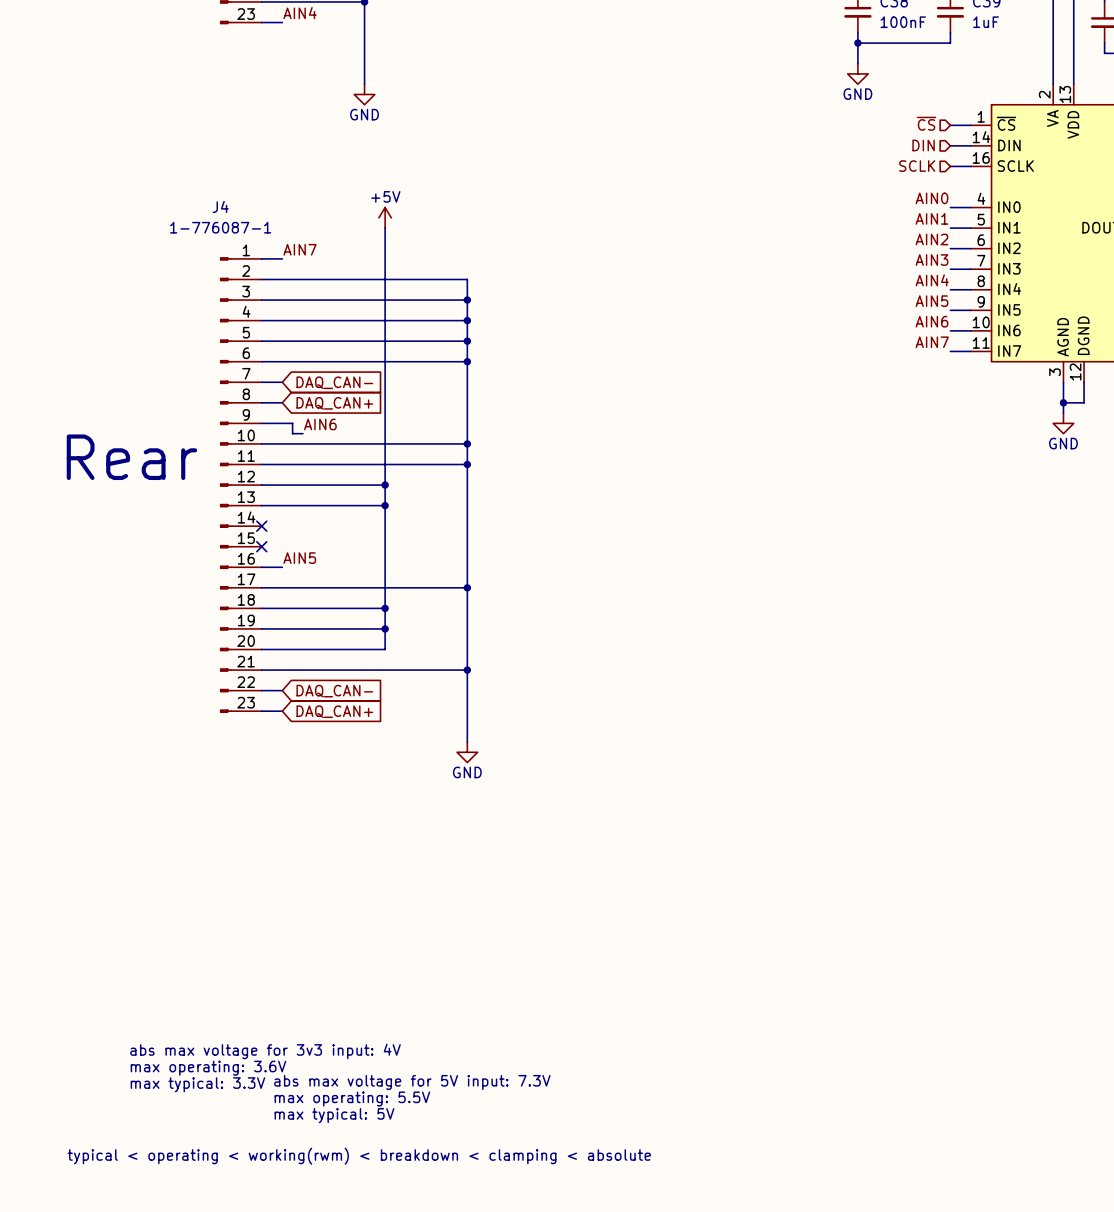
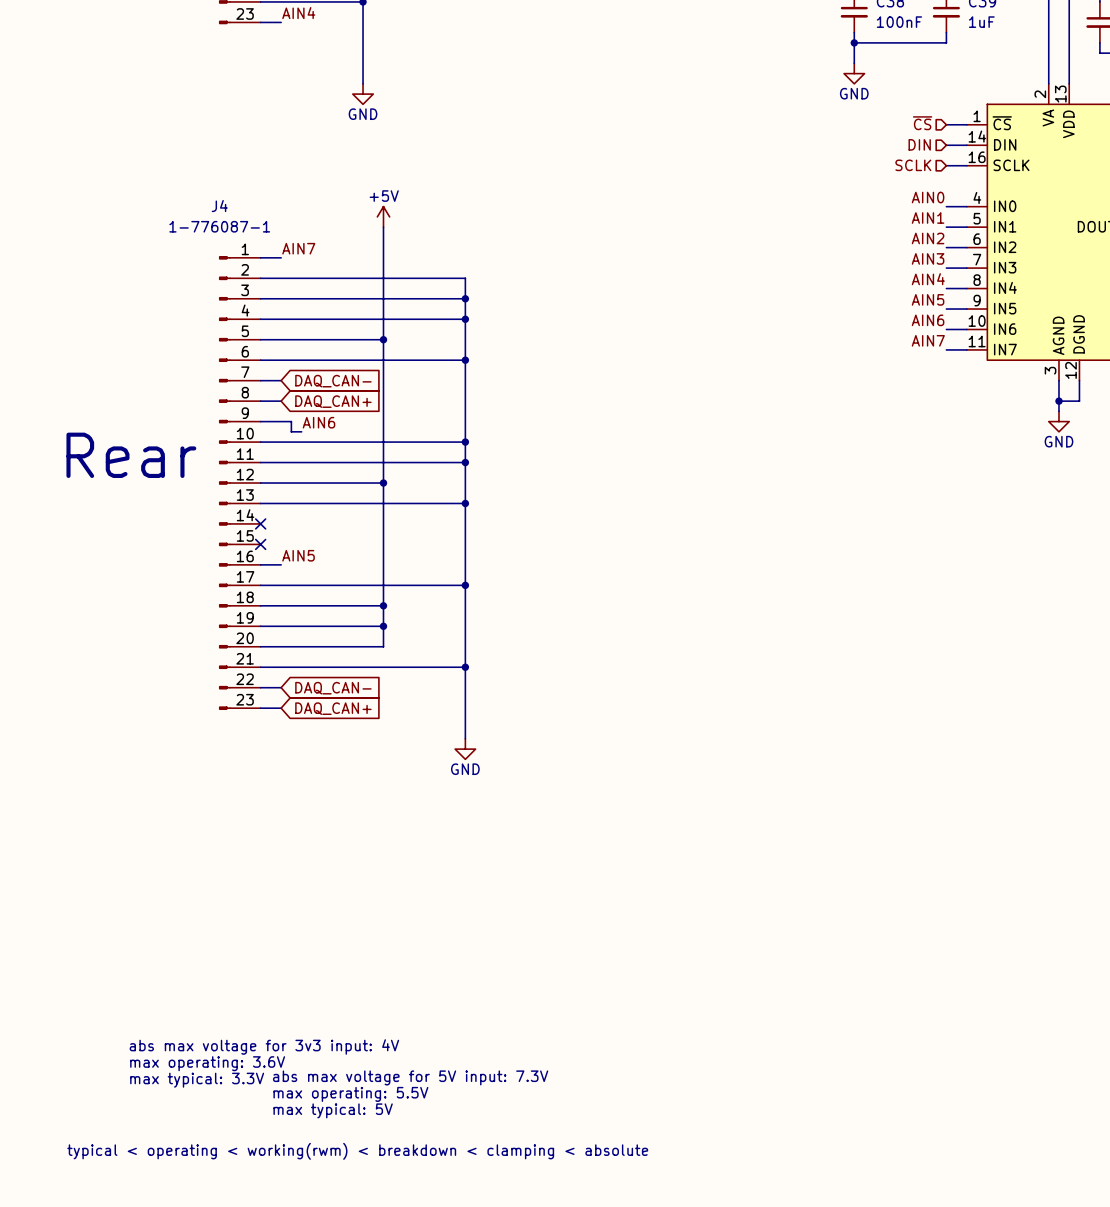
wire: (385, 341) (467, 341) -> (383, 503) (465, 503)
junction: none -> (383, 339)
junction: (467, 341) -> none
junction: (385, 505) -> none
junction: none -> (465, 503)

